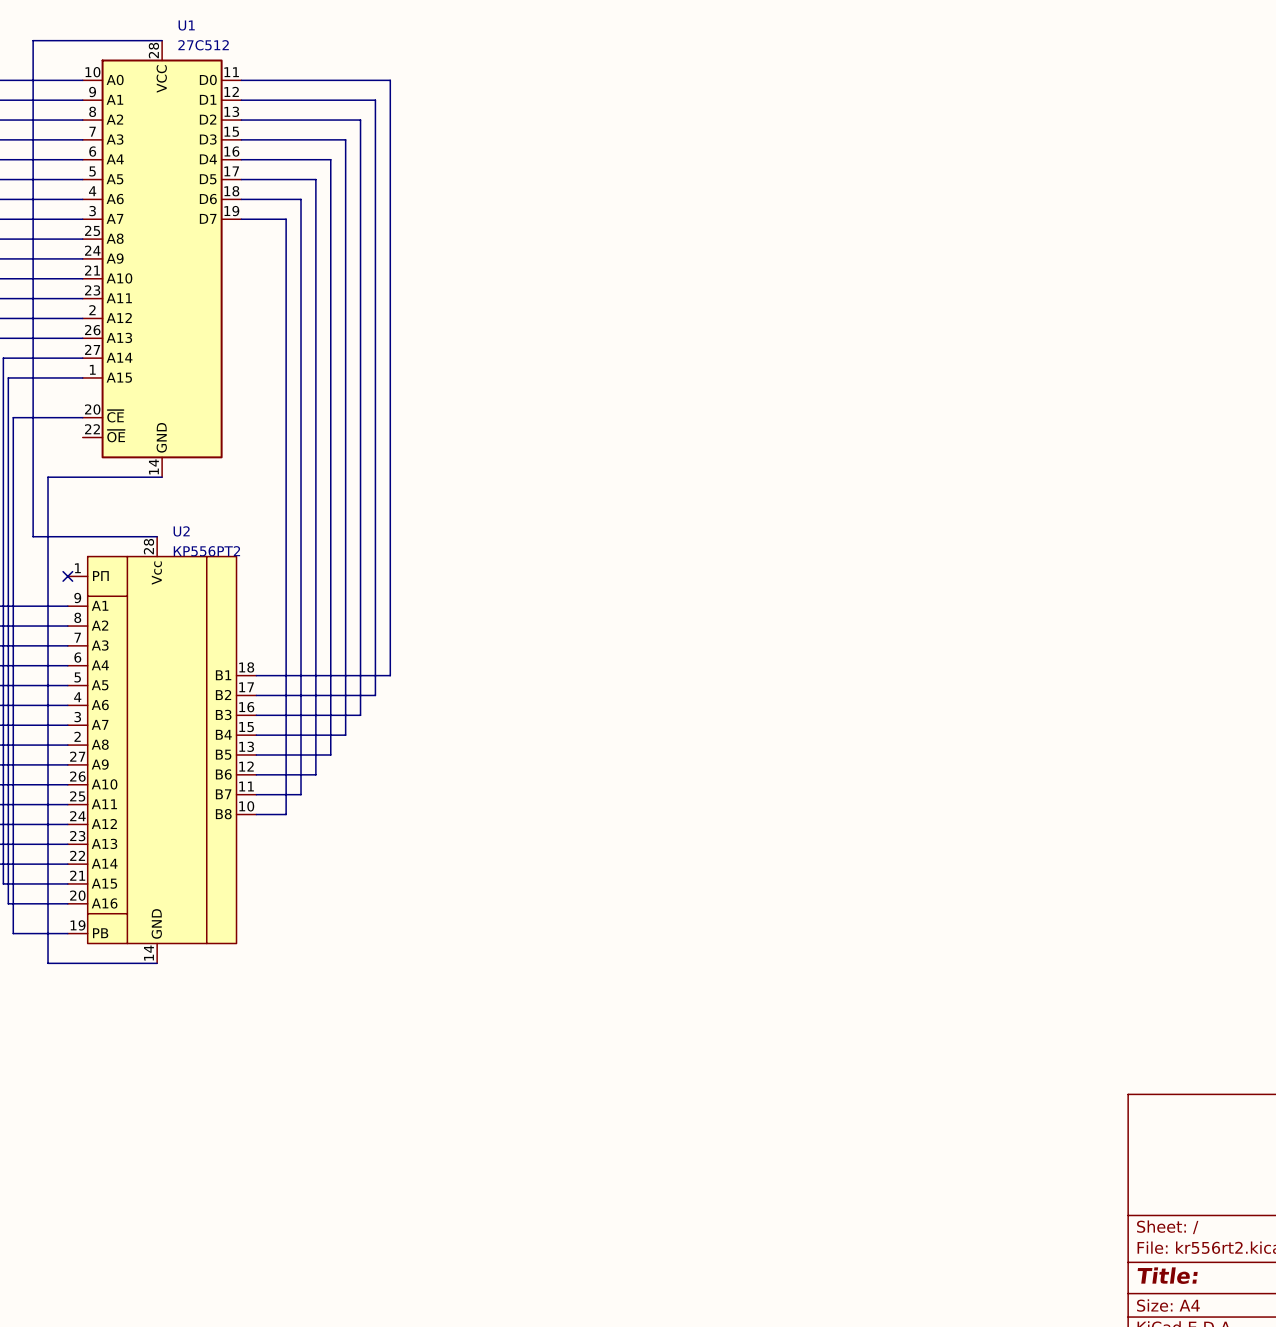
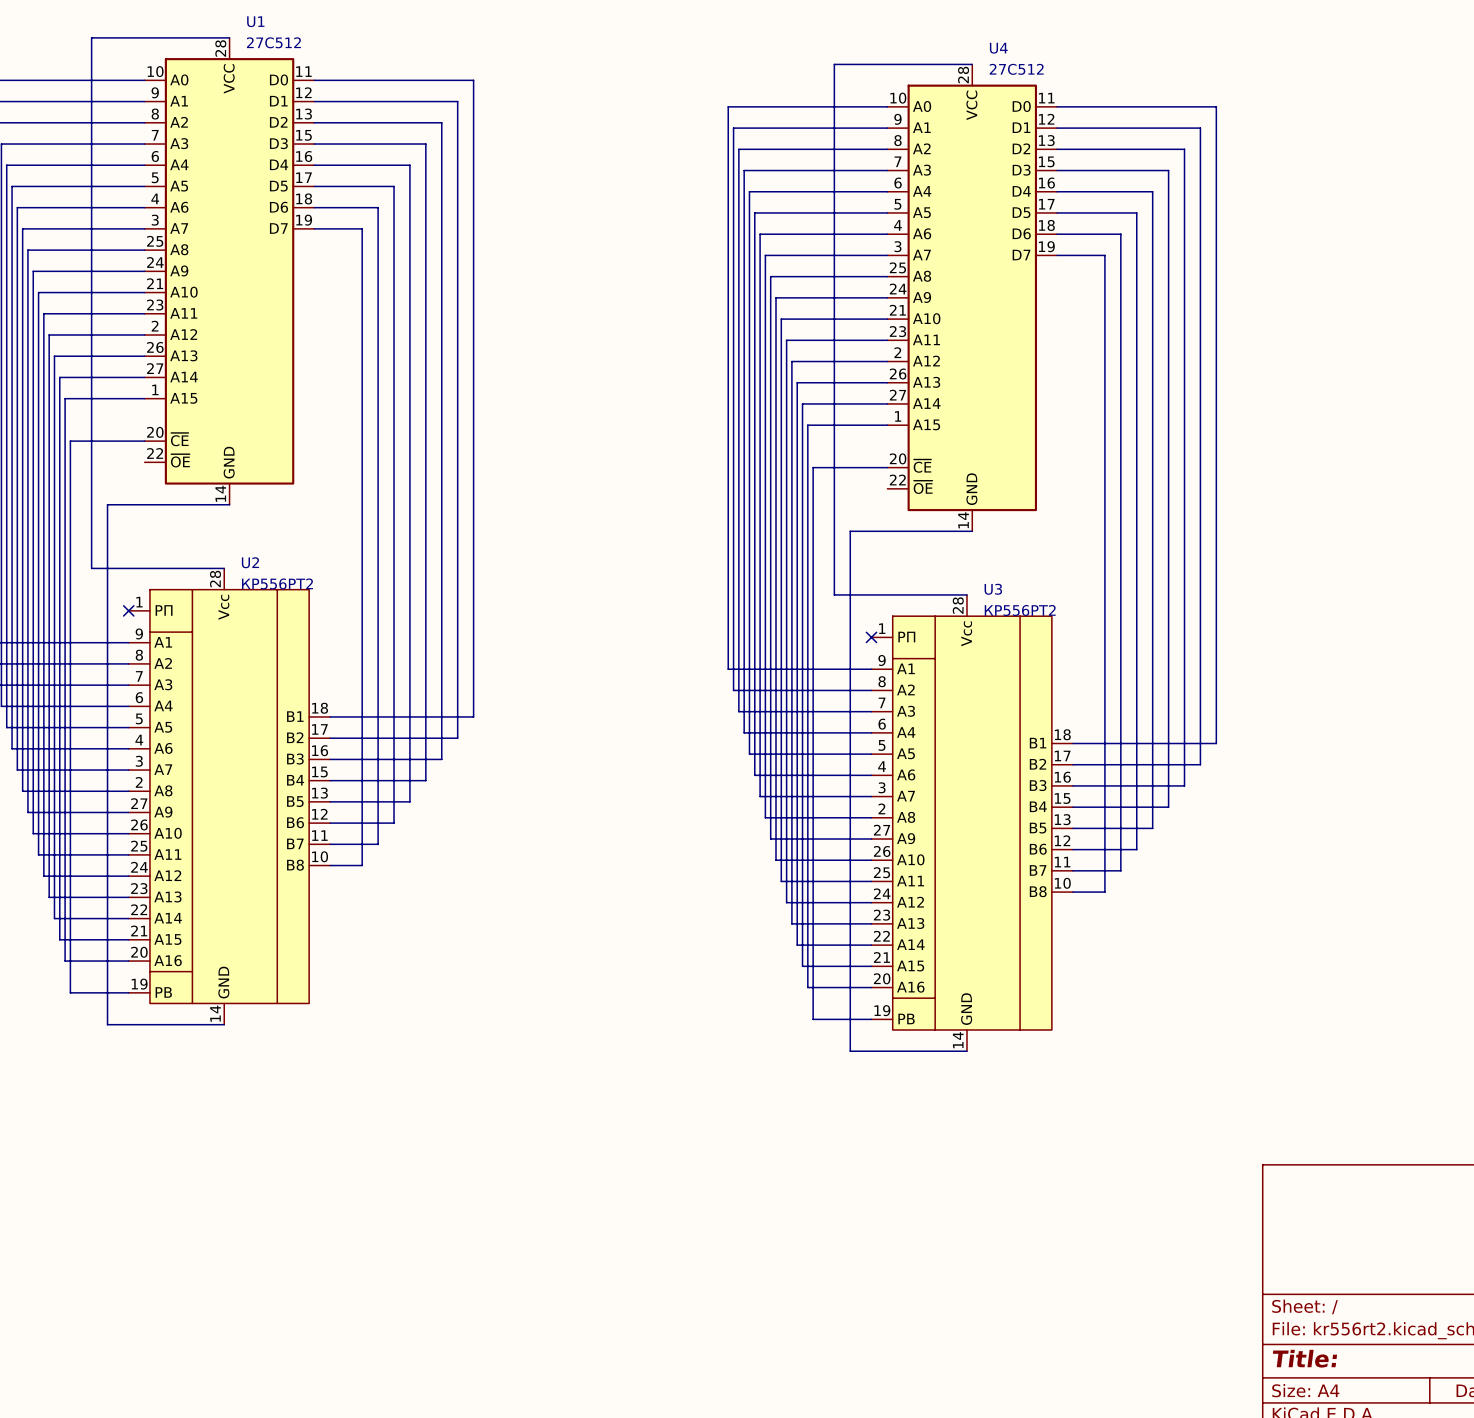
wire: none -> (972, 64) (834, 64) (834, 594) (966, 594)
wire: none -> (887, 106) (728, 106) (728, 669) (871, 669)
wire: none -> (1057, 106) (1216, 106) (1216, 743) (1073, 743)
wire: none -> (887, 128) (733, 128) (733, 690) (871, 690)
wire: none -> (1057, 128) (1200, 128) (1200, 764) (1073, 764)
wire: none -> (887, 149) (738, 149) (738, 711) (871, 711)
wire: none -> (1057, 149) (1184, 149) (1184, 785) (1073, 785)
wire: none -> (887, 170) (744, 170) (744, 732) (871, 732)
wire: none -> (1057, 170) (1168, 170) (1168, 807) (1073, 807)
wire: none -> (887, 191) (749, 191) (749, 754) (871, 754)
wire: none -> (1057, 191) (1152, 191) (1152, 828) (1073, 828)
wire: none -> (887, 212) (754, 212) (754, 775) (871, 775)
wire: none -> (1057, 212) (1136, 212) (1136, 849) (1073, 849)
wire: none -> (887, 234) (760, 234) (760, 796) (871, 796)
wire: none -> (1057, 234) (1120, 234) (1120, 870) (1073, 870)
wire: none -> (887, 255) (765, 255) (765, 817) (871, 817)
wire: none -> (1057, 255) (1104, 255) (1104, 892) (1073, 892)
wire: none -> (887, 276) (770, 276) (770, 839) (871, 839)
wire: none -> (887, 297) (776, 297) (776, 860) (871, 860)
U4: none -> 27C512 (972, 297)
wire: none -> (887, 319) (781, 319) (781, 881) (871, 881)
wire: none -> (887, 340) (786, 340) (786, 902) (871, 902)
wire: none -> (887, 361) (791, 361) (791, 923) (871, 923)
wire: none -> (887, 382) (797, 382) (797, 945) (871, 945)
wire: none -> (887, 403) (802, 403) (802, 966) (871, 966)
wire: none -> (887, 425) (807, 425) (807, 987) (871, 987)
wire: none -> (887, 467) (813, 467) (813, 1019) (871, 1019)
wire: none -> (972, 531) (850, 531) (850, 1051) (966, 1051)
no-connect mark: none -> (871, 637)
U3: none -> КР556РТ2 (972, 823)

